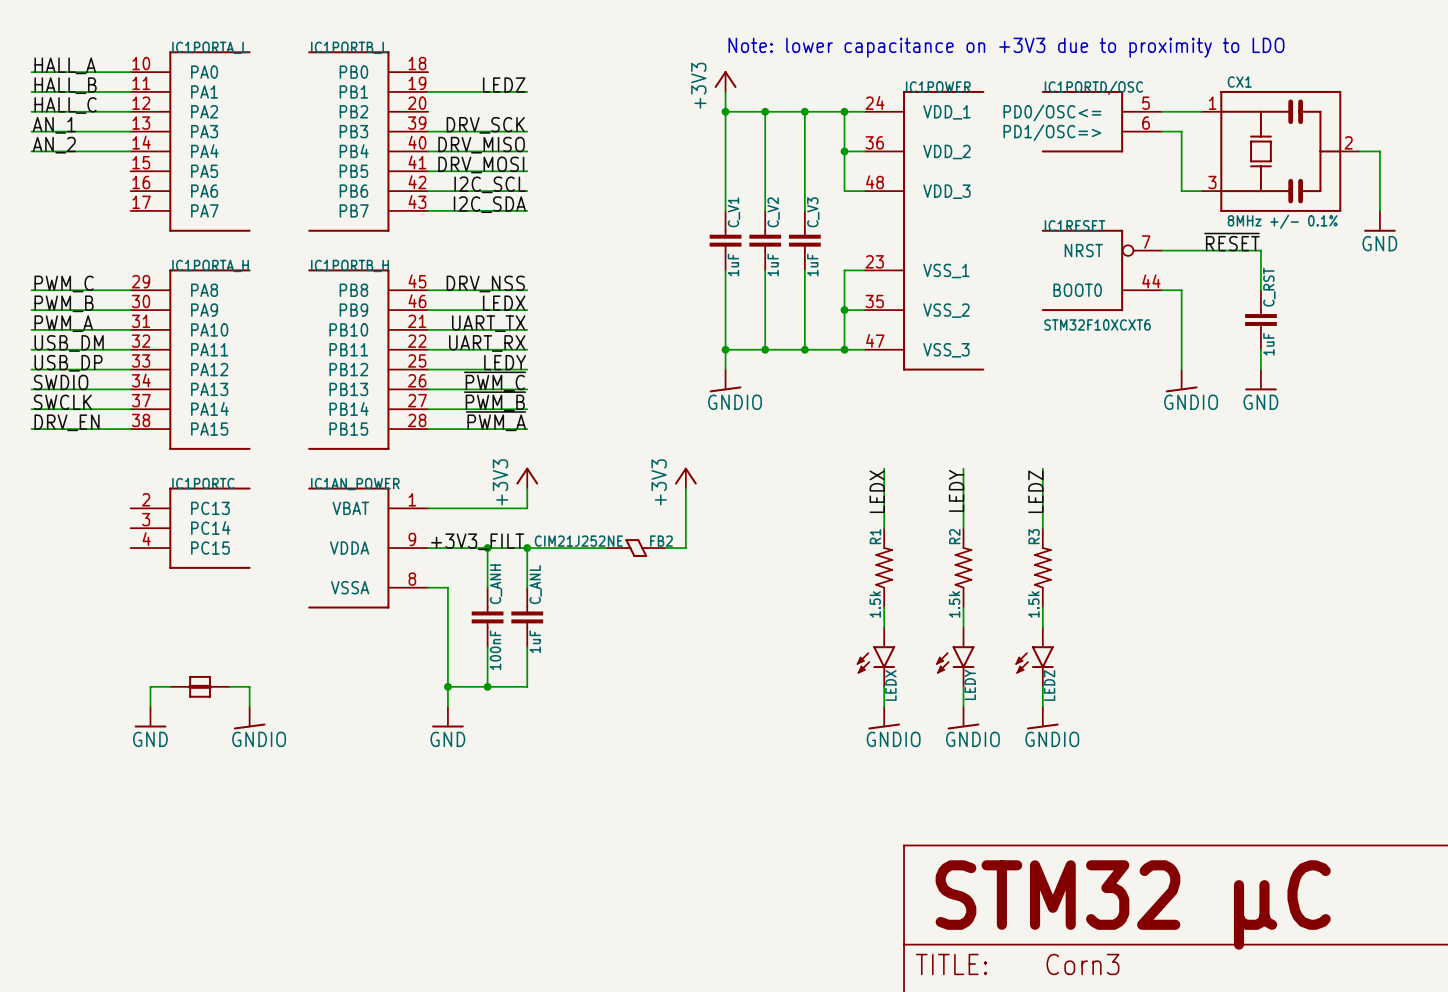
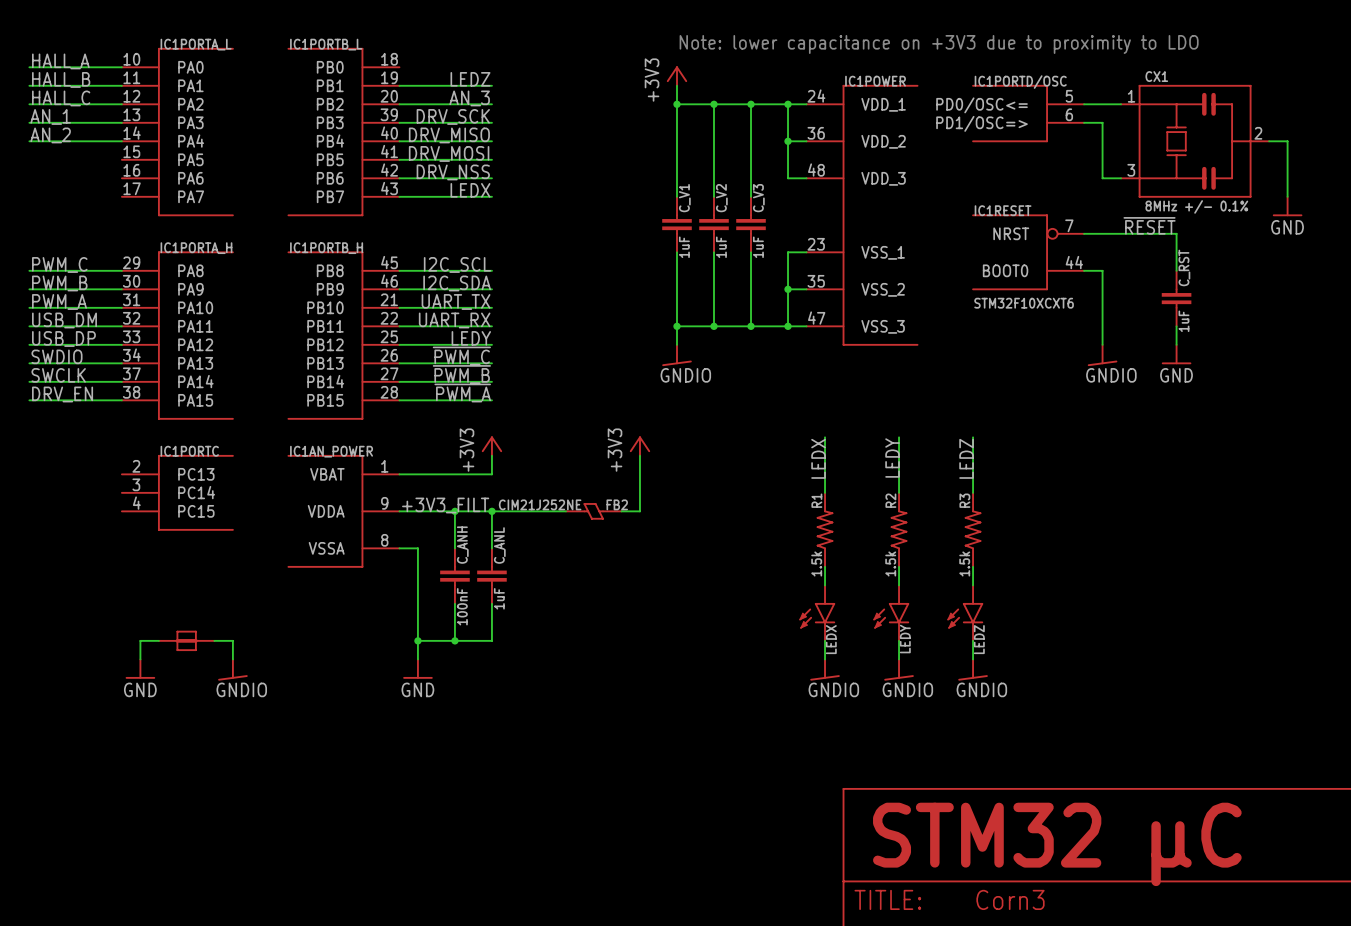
label: none -> AN_3 (469, 98)
wire: none -> (399, 104) (491, 104)
label: I2C_SCL (490, 184) -> DRV_NSS (453, 172)
label: I2C_SDA (489, 204) -> LEDX (470, 190)
label: DRV_NSS (485, 283) -> I2C_SCL (457, 264)
label: LEDX (504, 303) -> I2C_SDA (457, 283)

